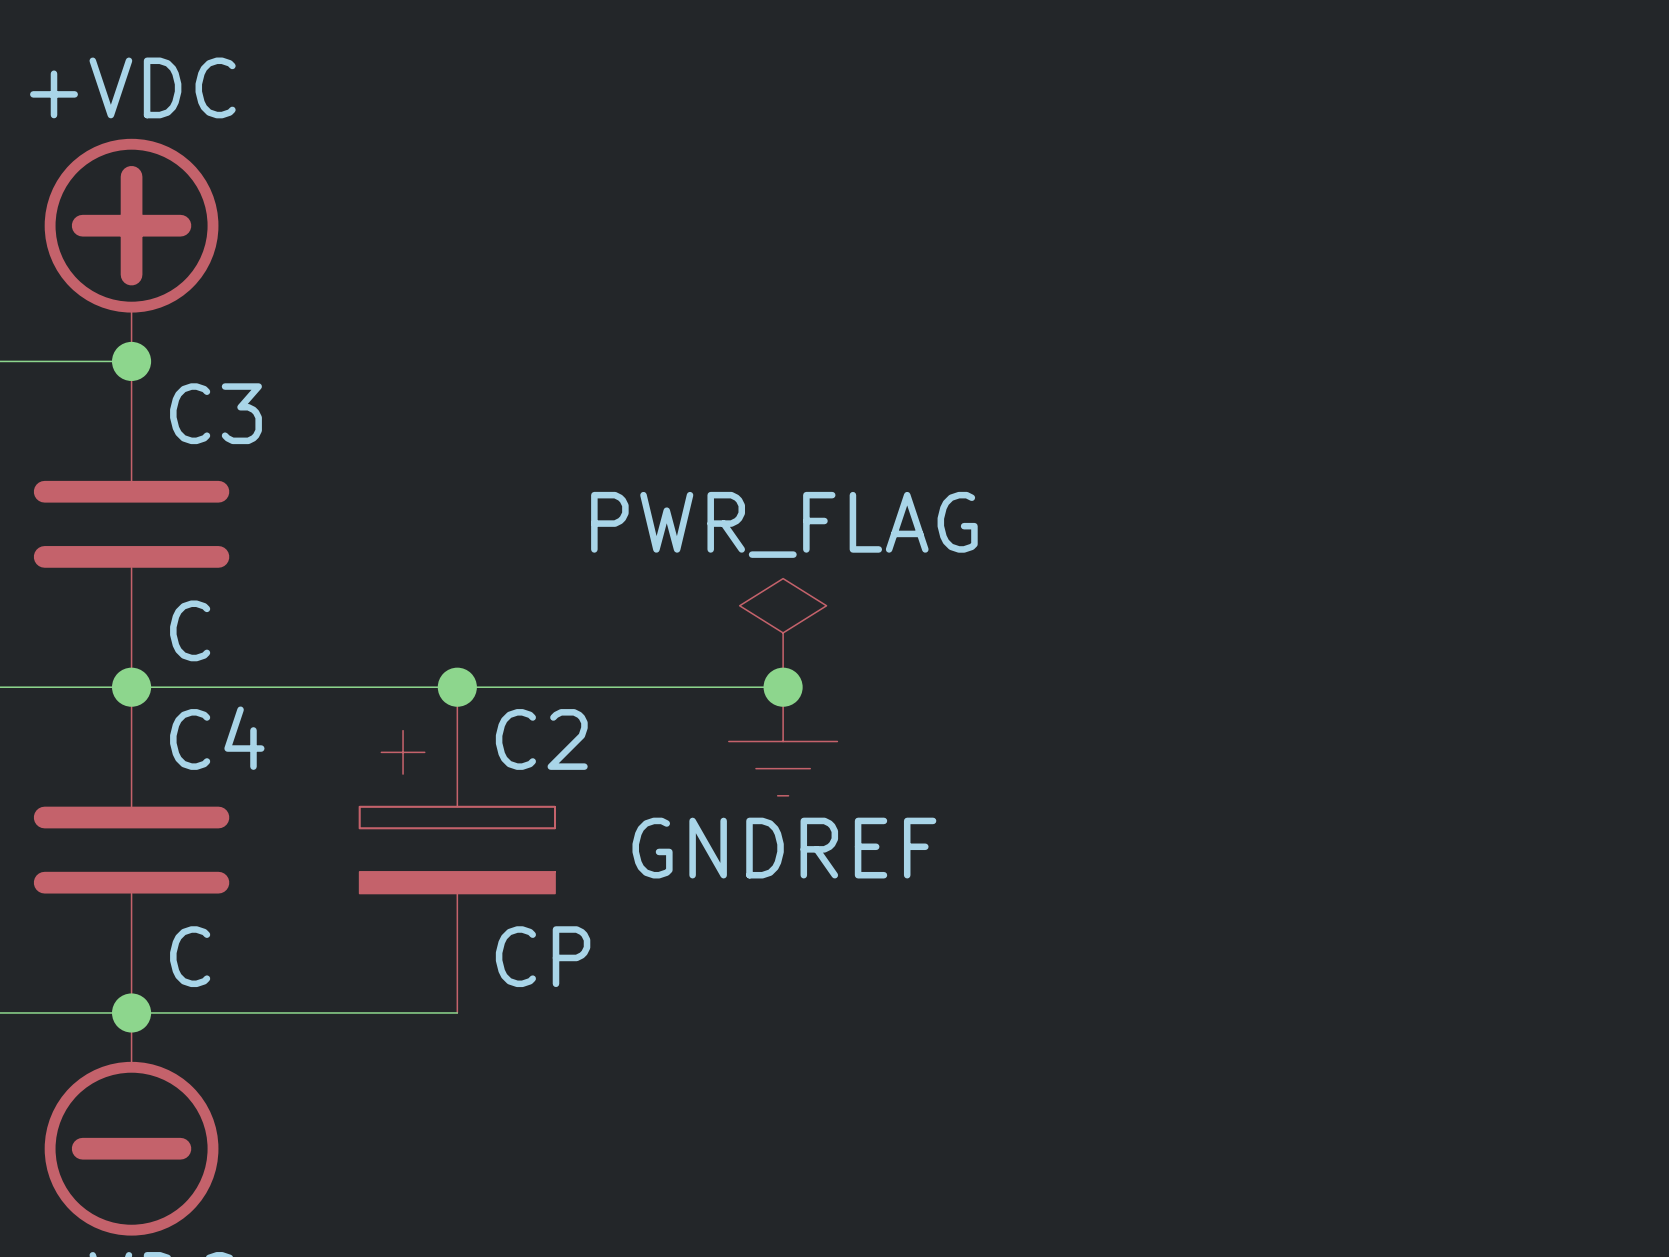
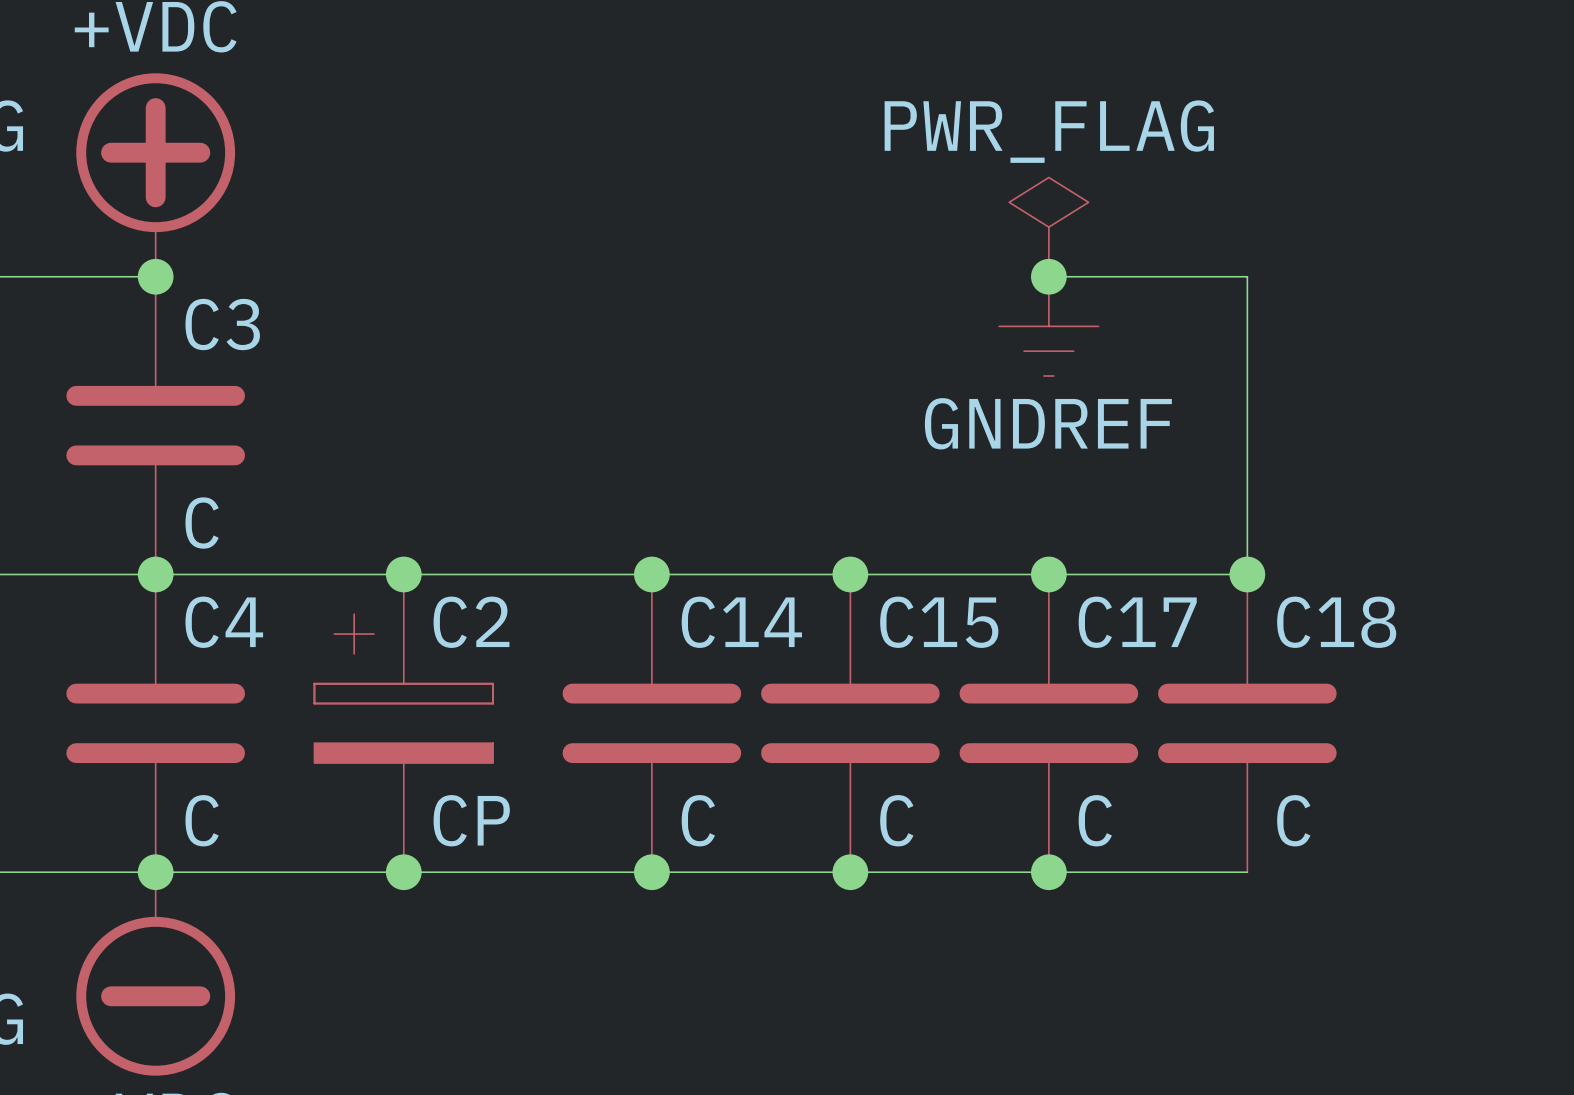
wire: none -> (1048, 276) (1247, 276) (1247, 574) (751, 574)
junction: none -> (1048, 276)
power symbol position: PWR_FLAG (783, 632) -> PWR_FLAG (1048, 227)
junction position: (457, 687) -> (403, 574)
junction: none -> (651, 574)
junction: (783, 687) -> none
junction: none -> (850, 574)
junction: none -> (1048, 574)
junction: none -> (1247, 574)
power symbol position: GNDREF (783, 741) -> GNDREF (1048, 326)
C2 position: (457, 850) -> (403, 723)
C14: none -> C (651, 723)
C15: none -> C (850, 723)
C17: none -> C (1048, 723)
C18: none -> C (1247, 723)
junction: none -> (403, 872)
wire: none -> (453, 872) (1247, 872)
junction: none -> (651, 872)
junction: none -> (850, 872)
junction: none -> (1048, 872)

